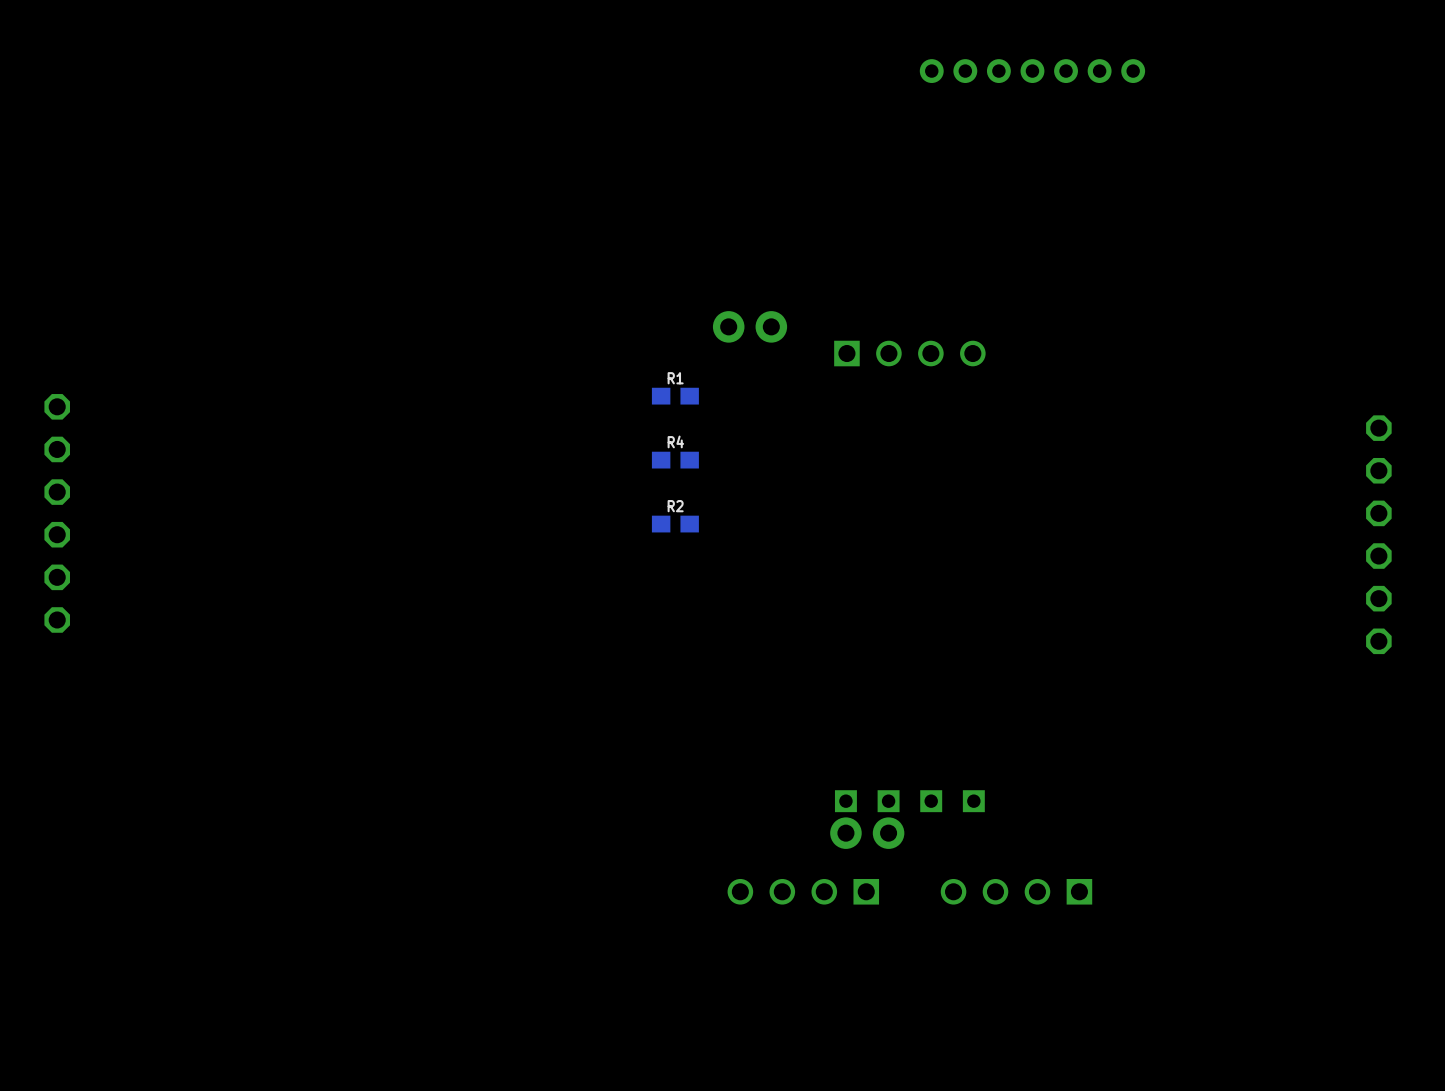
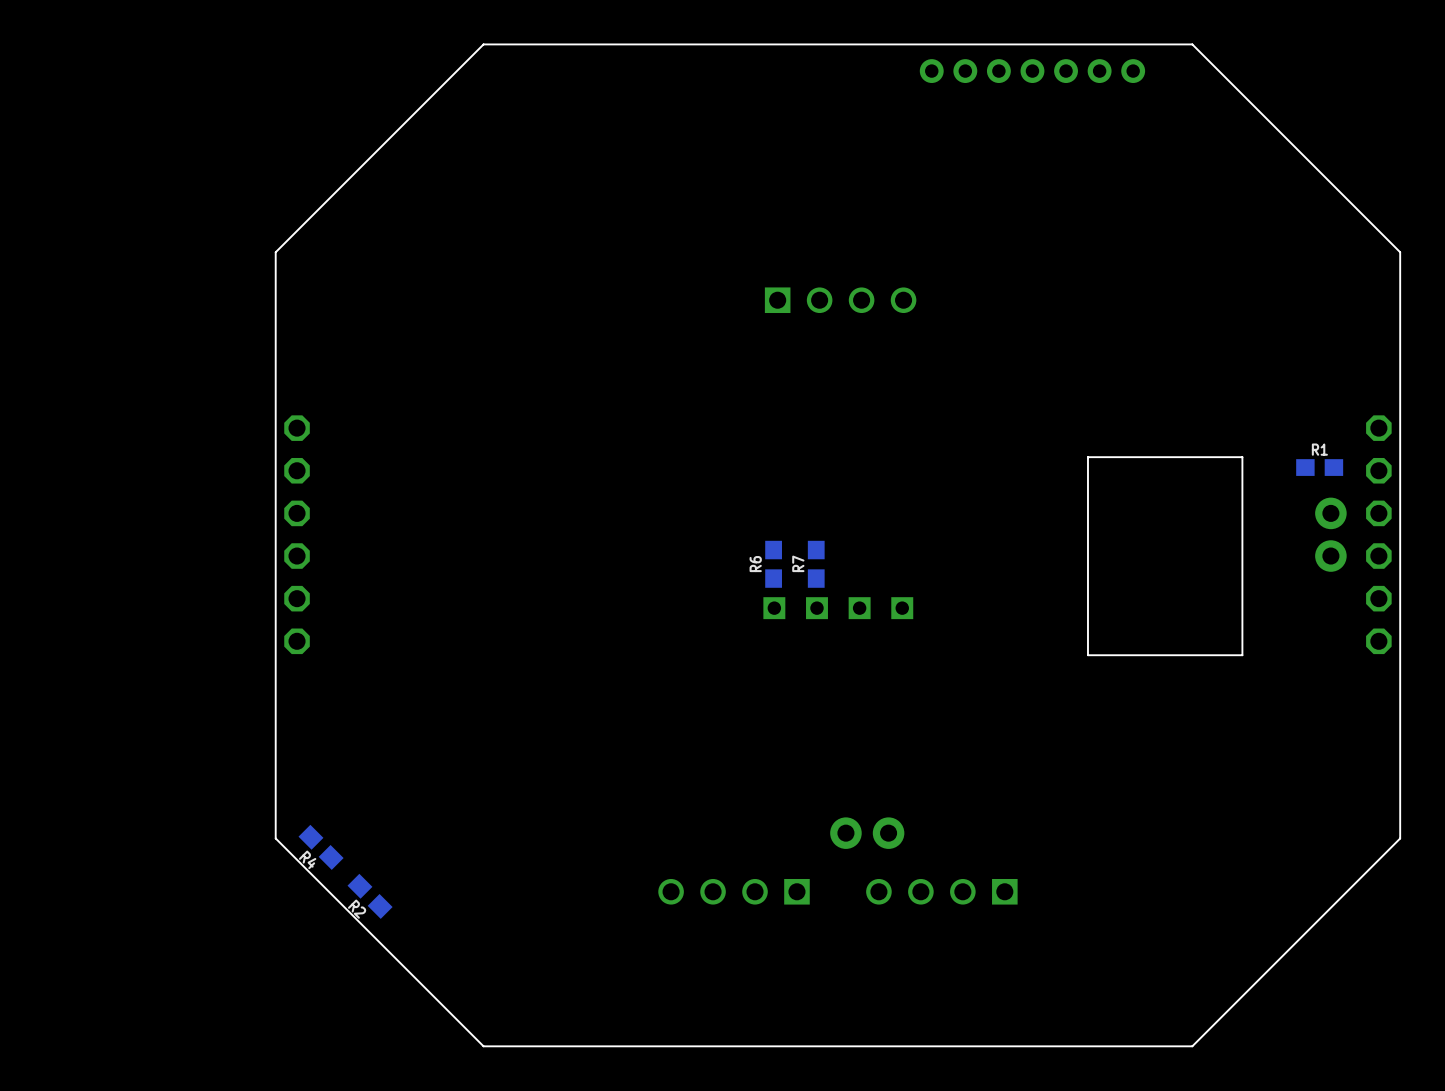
board edge: none -> (1192, 44) (1400, 252) (1400, 838) (1192, 1046) (483, 1046) (275, 838) (275, 252) (483, 44) (1192, 44)
part: (750, 326) -> none
part position: (909, 353) -> (840, 300)
R1 position: (675, 396) -> (1319, 467)
board edge: none -> (1242, 457) (1242, 655) (1087, 655) (1087, 457) (1242, 457)
R4 rotation: 0° (675, 460) -> 45° clockwise (321, 847)
R4 position: (675, 460) -> (321, 847)
part position: (57, 513) -> (297, 534)
R2 rotation: 0° (675, 524) -> 45° clockwise (370, 896)
R2 position: (675, 524) -> (370, 896)
part: none -> (1330, 534)
R6: none -> (773, 564)
R7: none -> (816, 564)
part position: (909, 801) -> (838, 608)
part: none -> (734, 891)
part: (803, 891) -> none
part: none -> (941, 891)
part: (1016, 891) -> none

